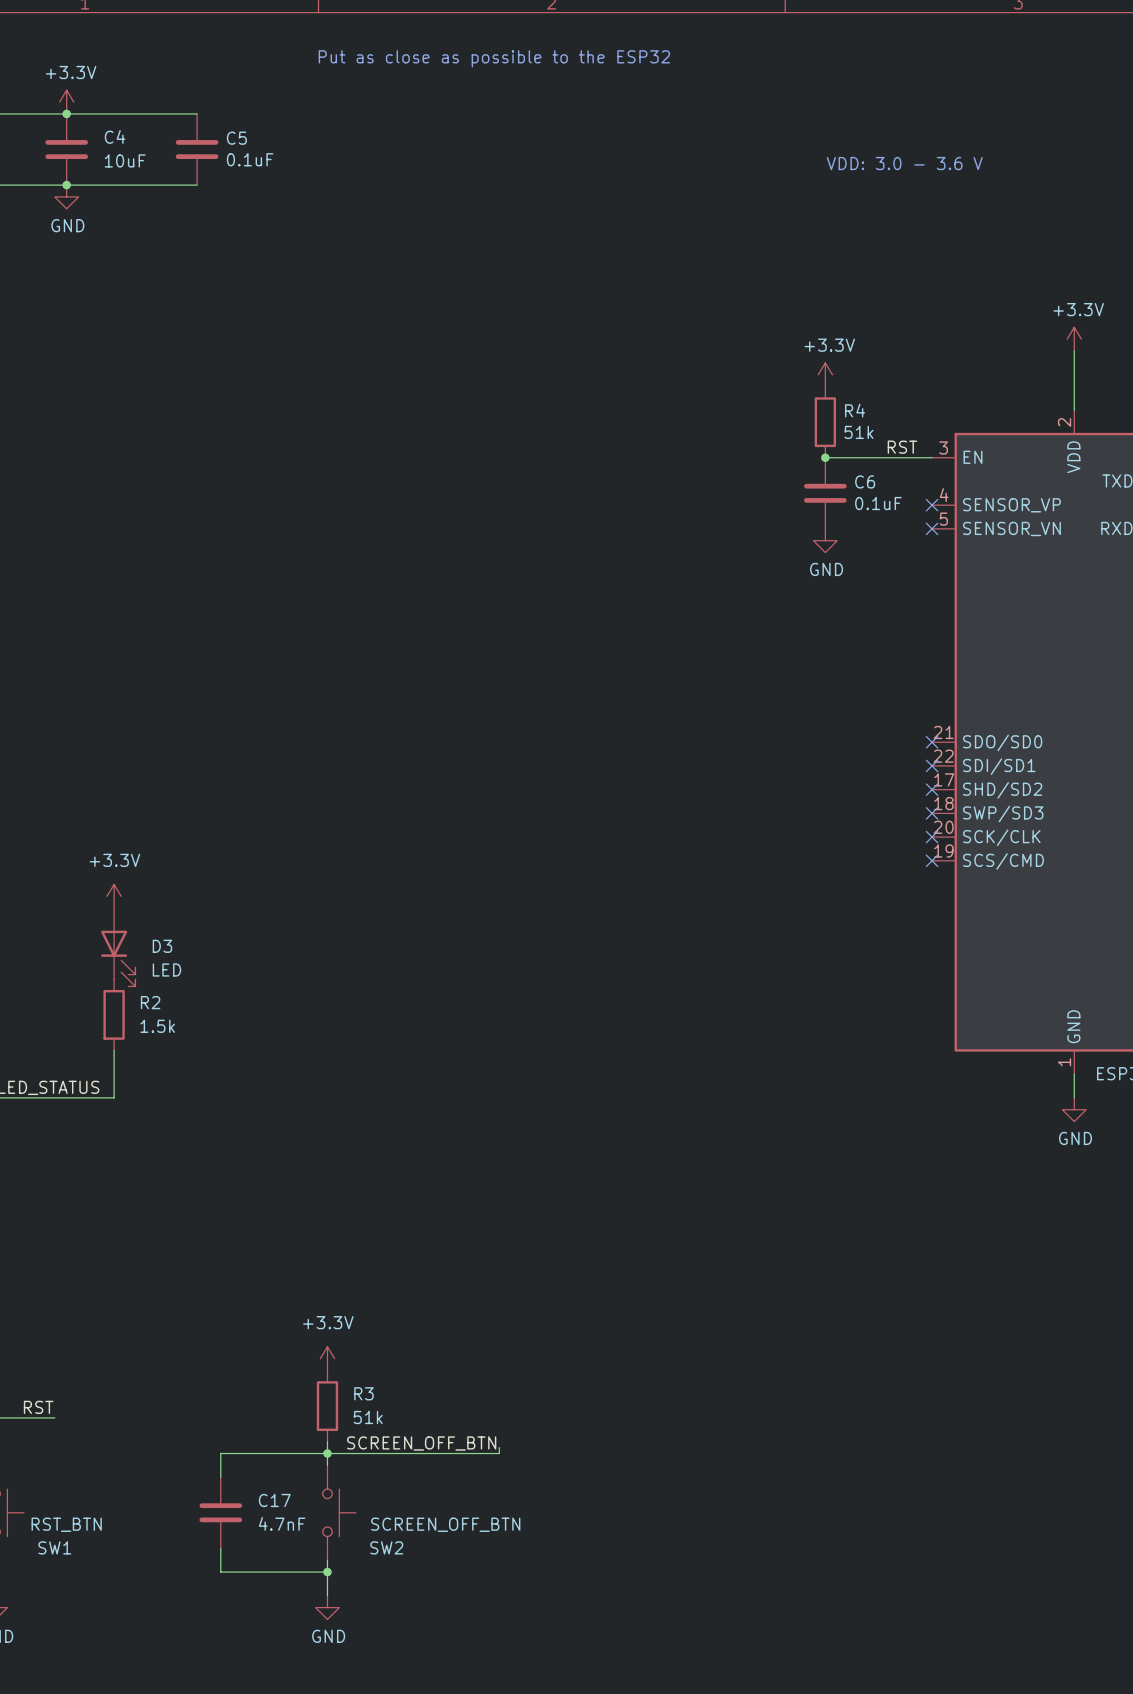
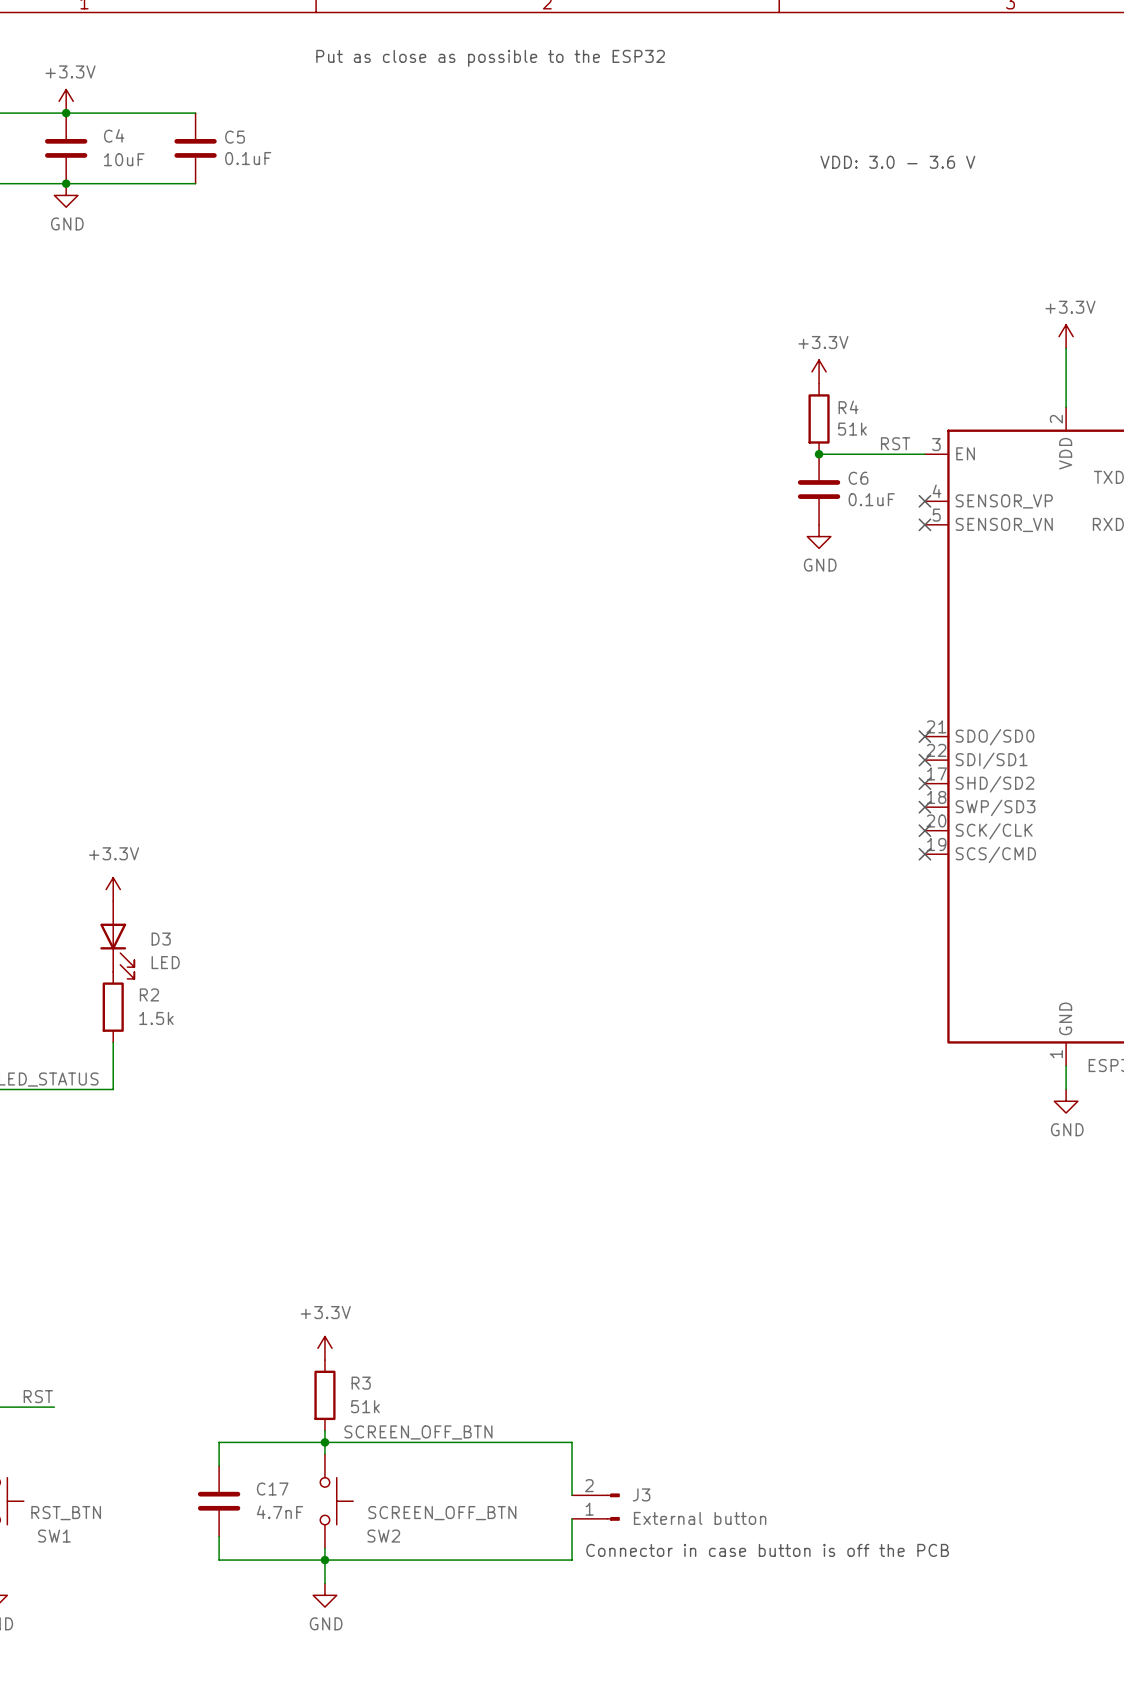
wire: (499, 1447) (499, 1453) -> (572, 1495) (572, 1442) (495, 1442)
J3: none -> External button (595, 1507)
wire: none -> (572, 1518) (572, 1560) (324, 1560)
text: none -> Connector in case button is off the PCB (767, 1550)

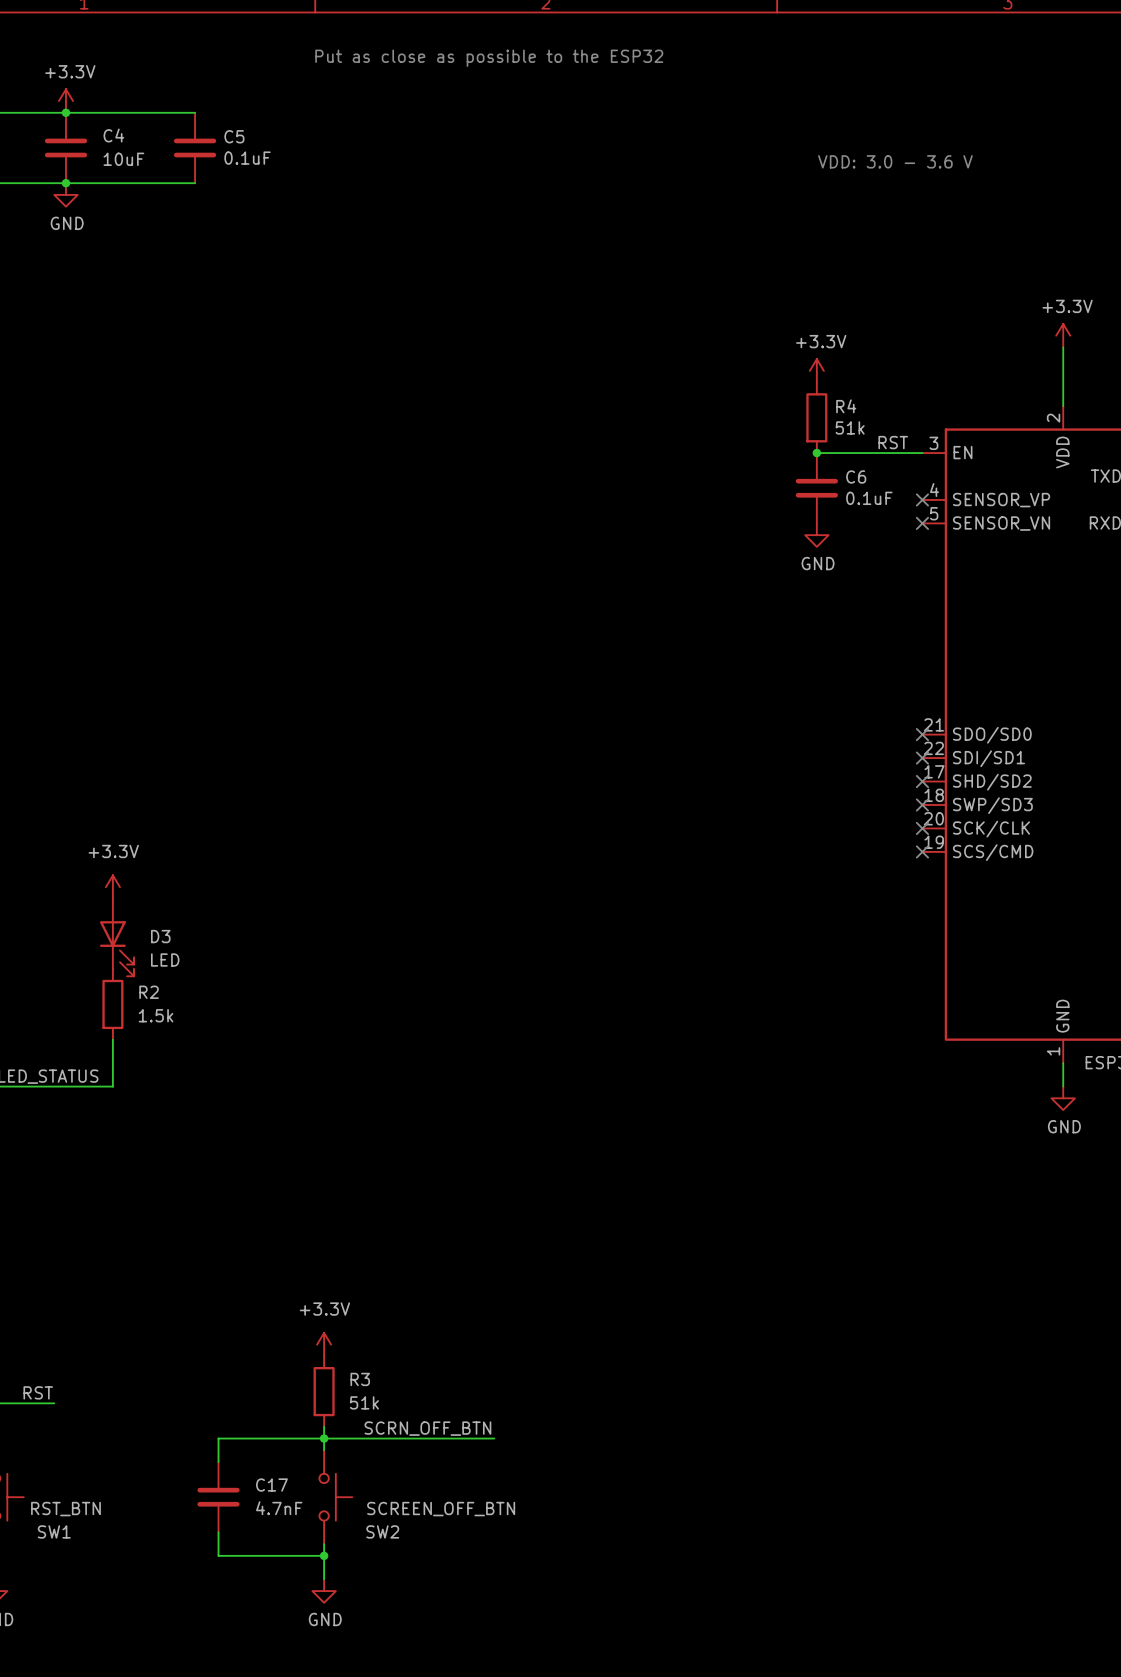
label: SCREEN_OFF_BTN (418, 1432) -> SCRN_OFF_BTN (427, 1428)
wire: (495, 1442) (572, 1442) (572, 1495) -> none
J3: External button (595, 1507) -> none
wire: (572, 1518) (572, 1560) (324, 1560) -> none
text: Connector in case button is off the PCB (767, 1550) -> none

